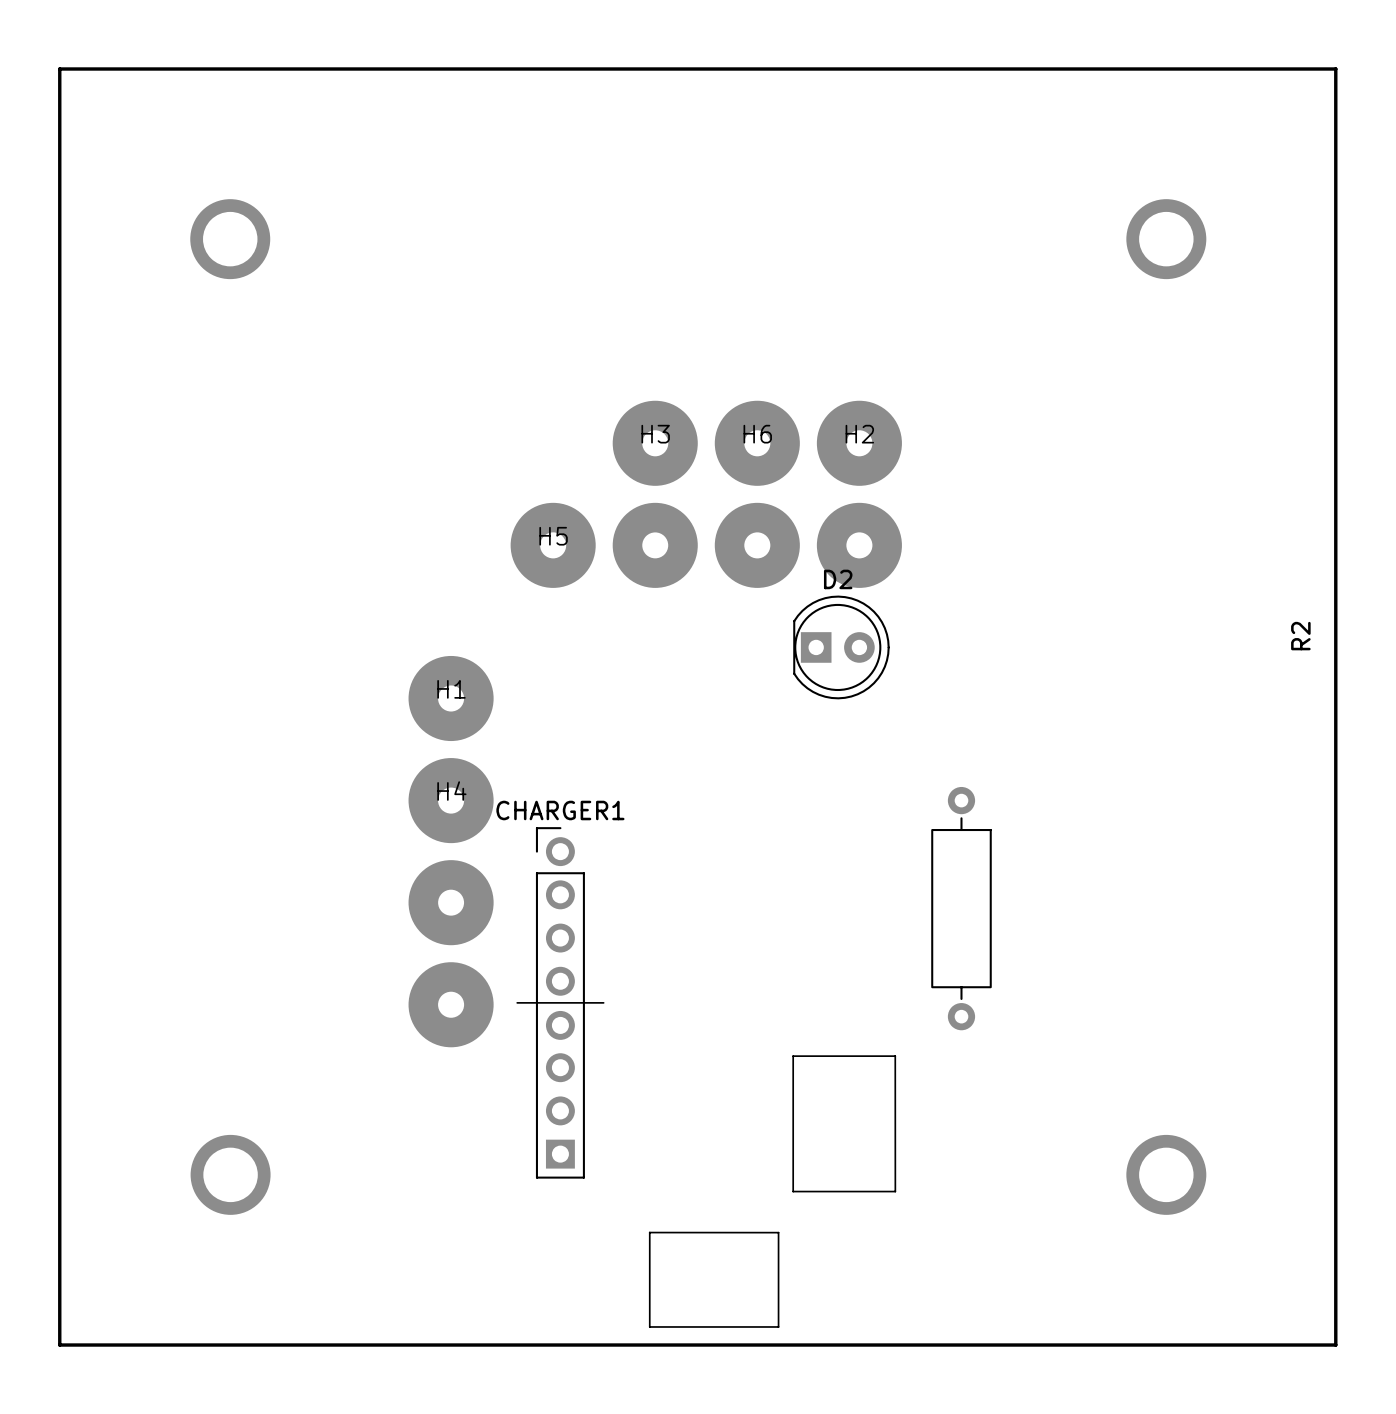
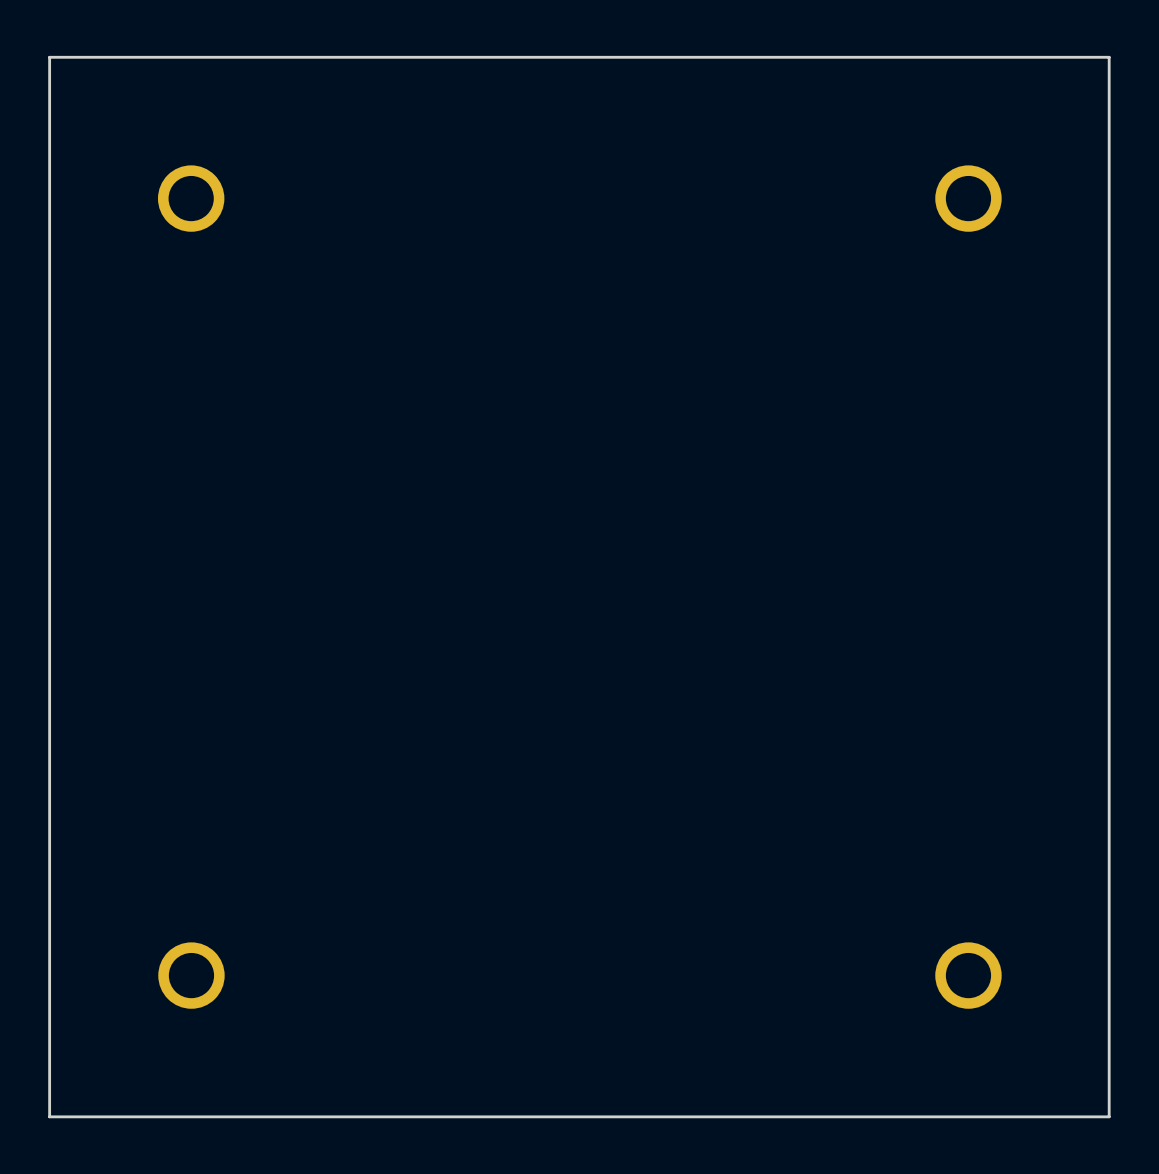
H3: (655, 443) -> none
H6: (757, 443) -> none
H2: (859, 443) -> none
H5: (553, 545) -> none
part: (757, 545) -> none
D2: (841, 647) -> none
H1: (451, 698) -> none
H4: (451, 800) -> none
R2: (961, 908) -> none
part: (451, 953) -> none
CHARGER1: (706, 1077) -> none

